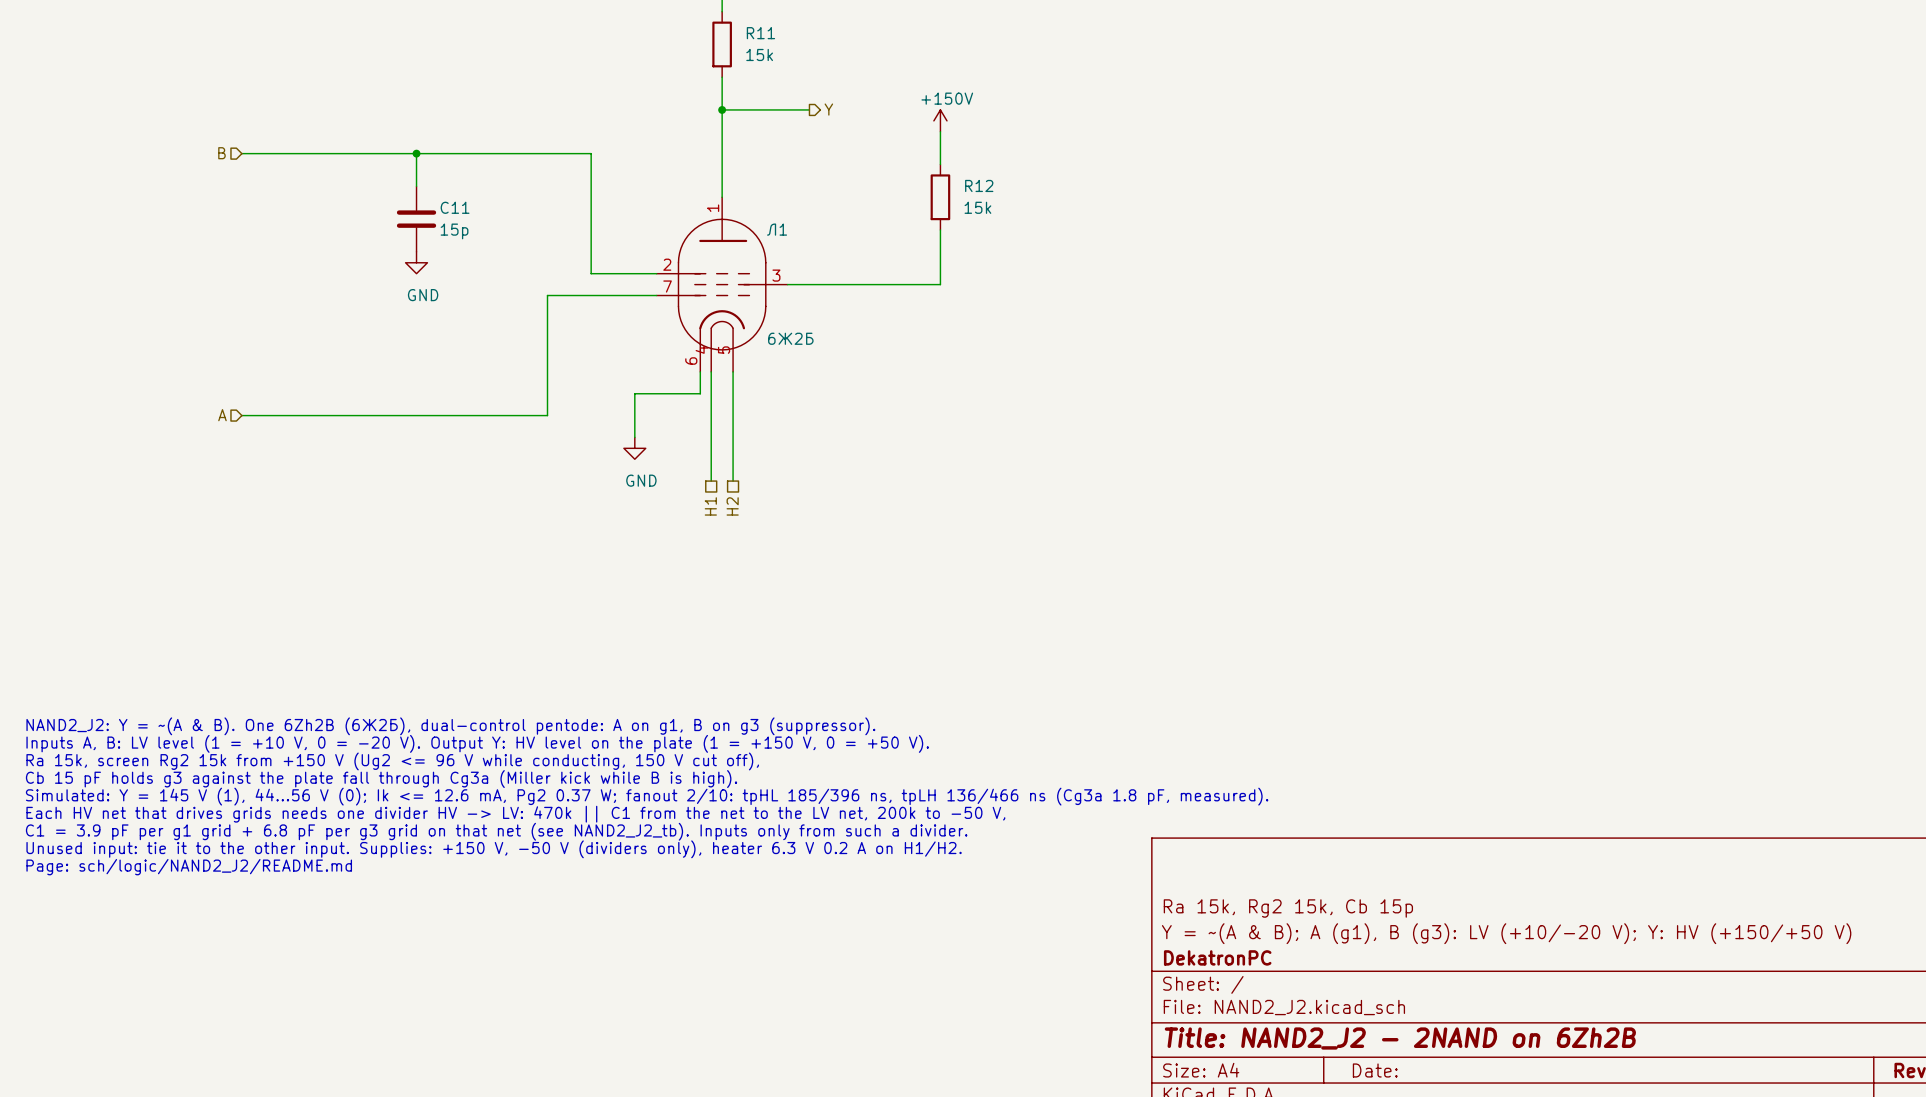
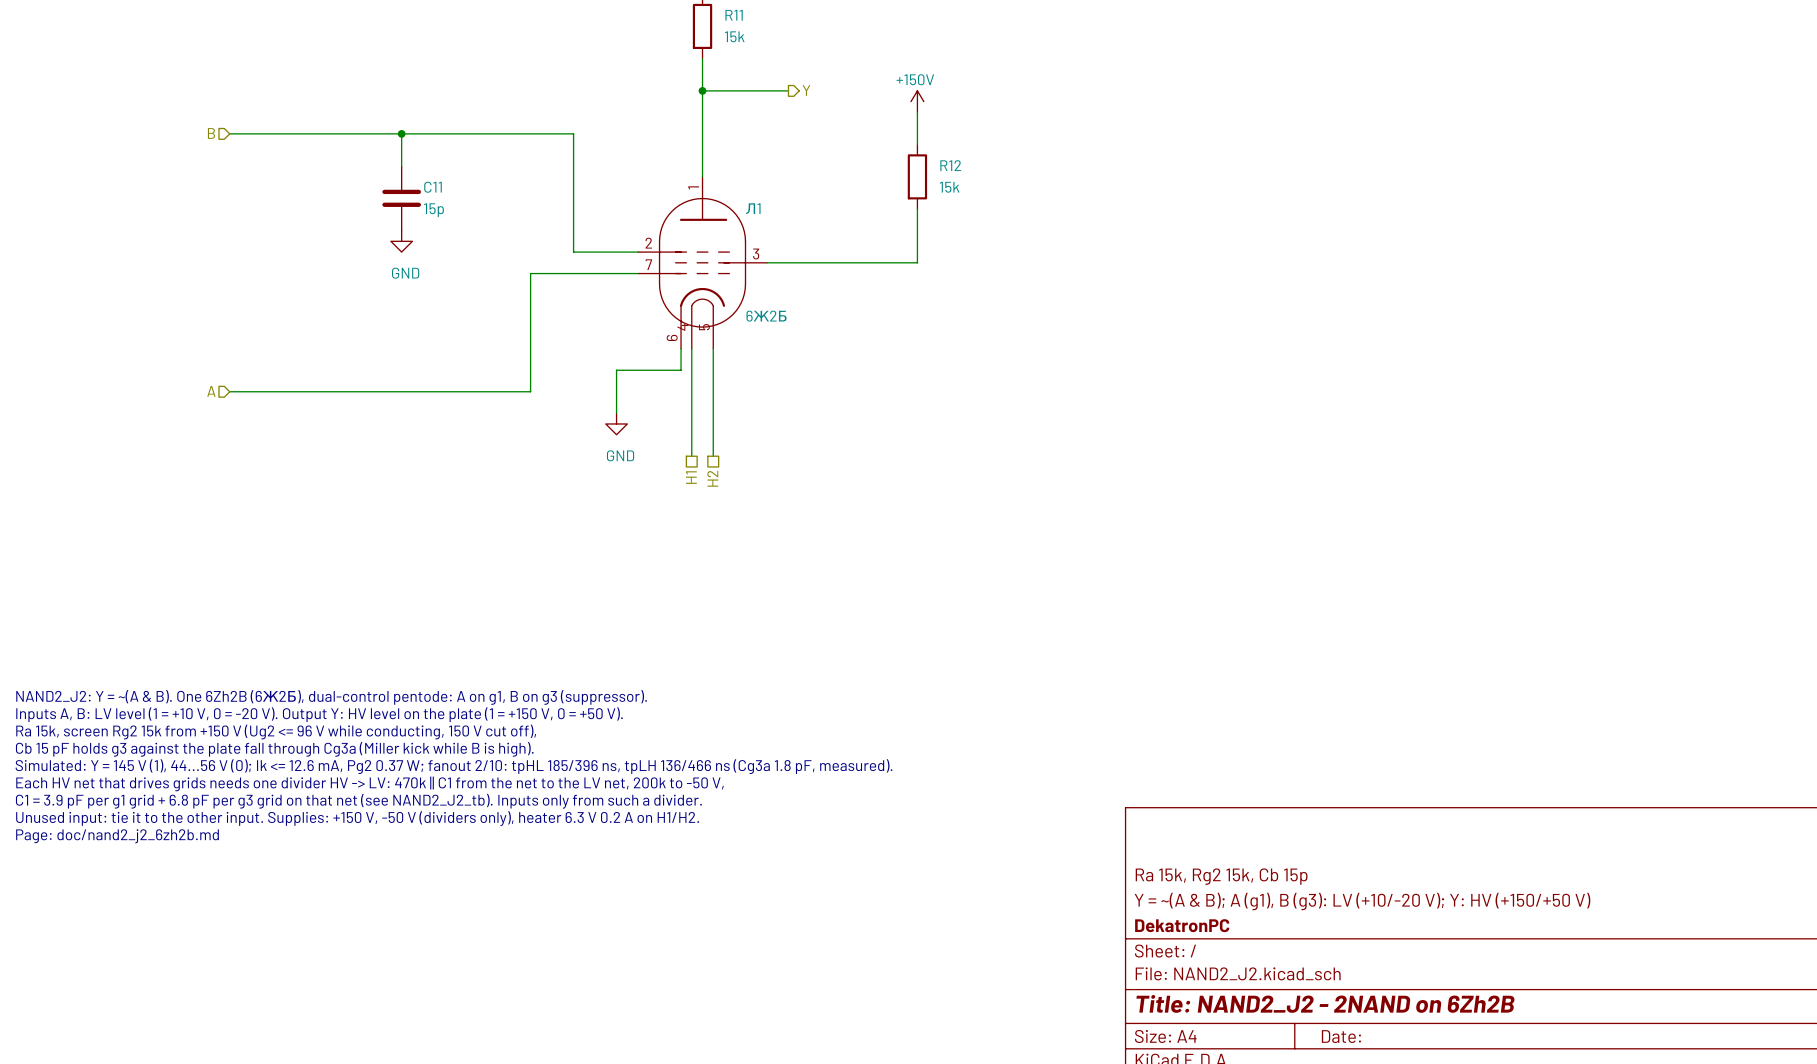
text: Page: sch/logic/NAND2_J2/README.md (189, 867) -> Page: doc/nand2_j2_6zh2b.md (117, 836)

